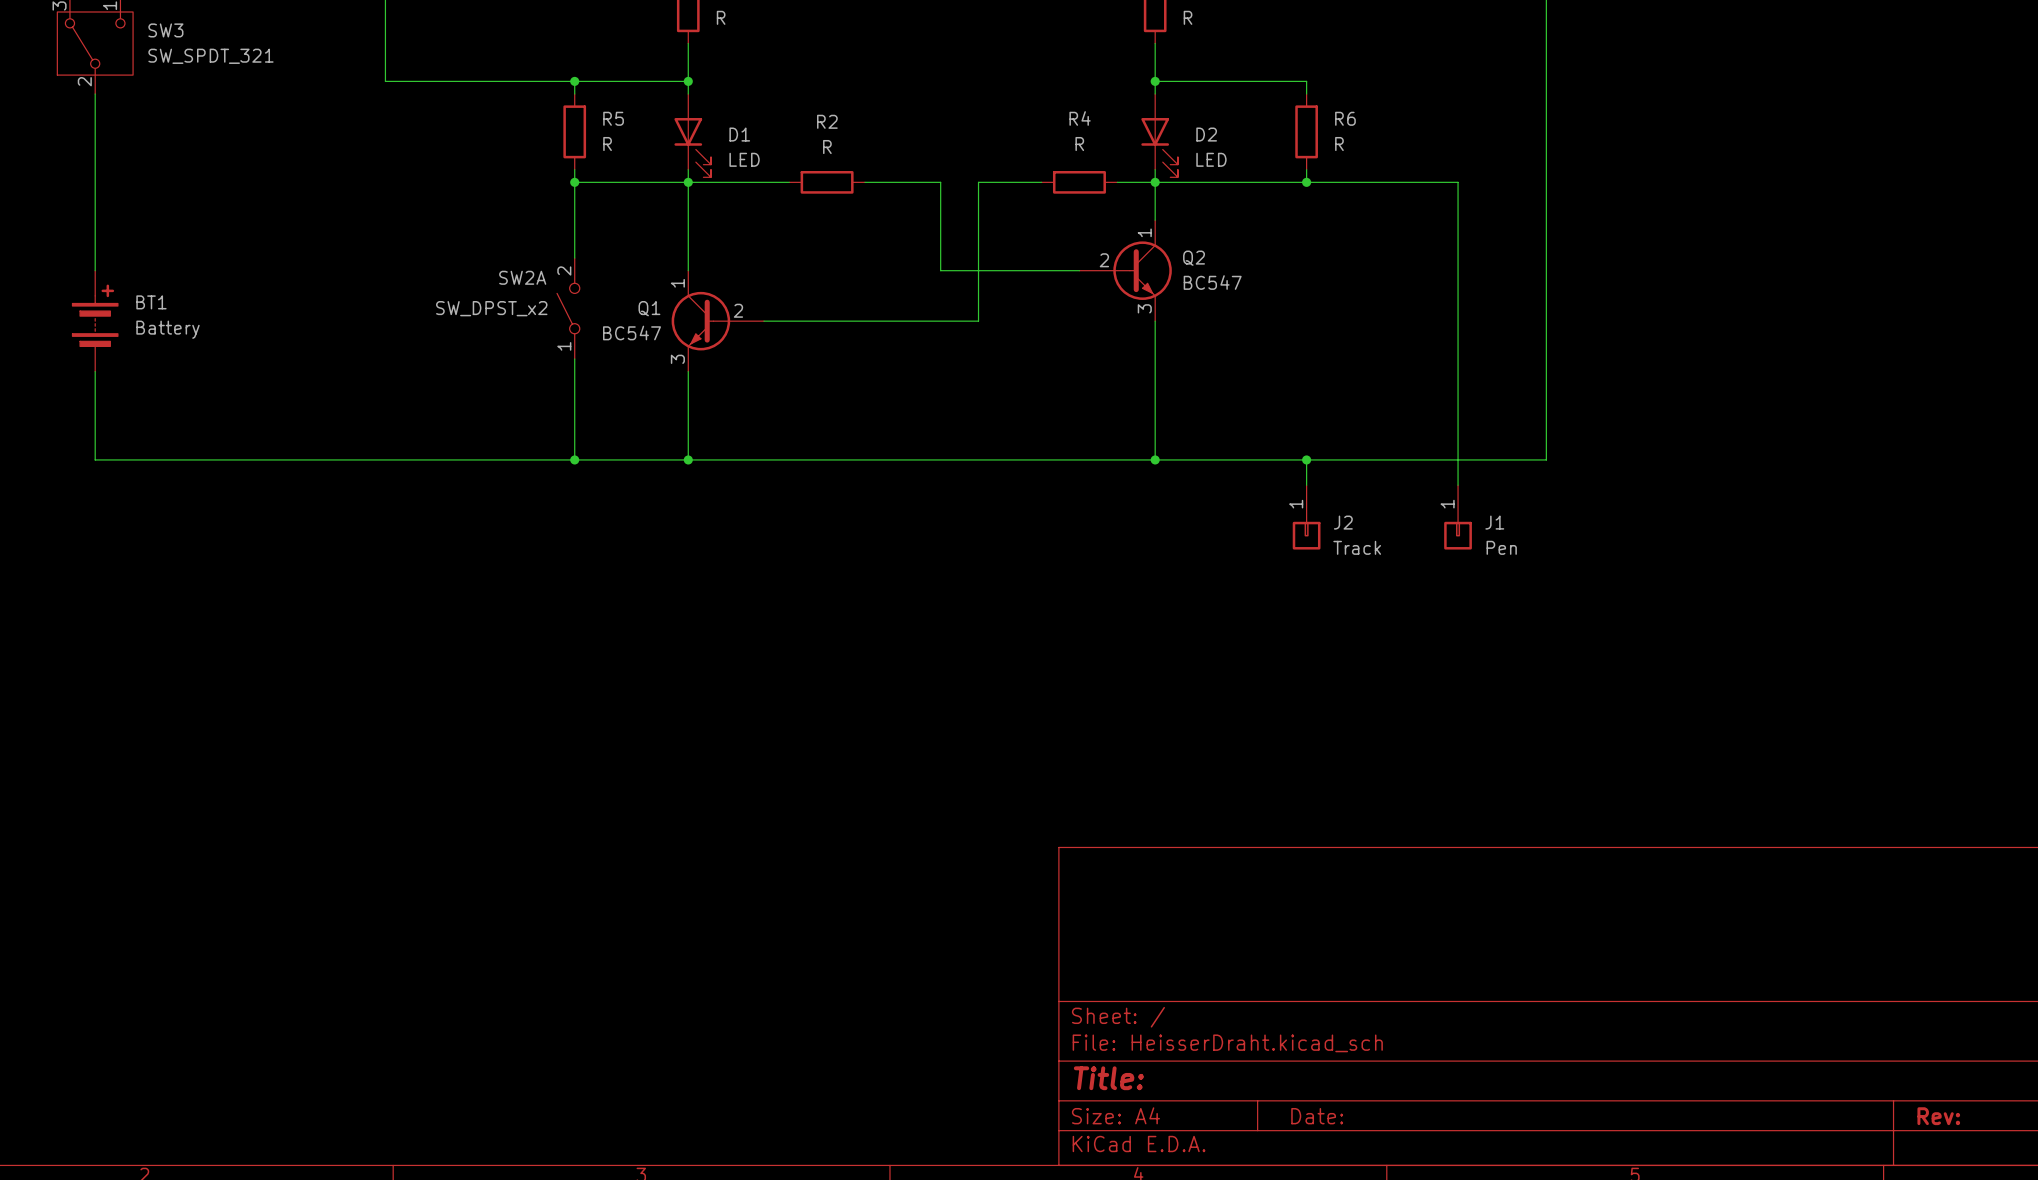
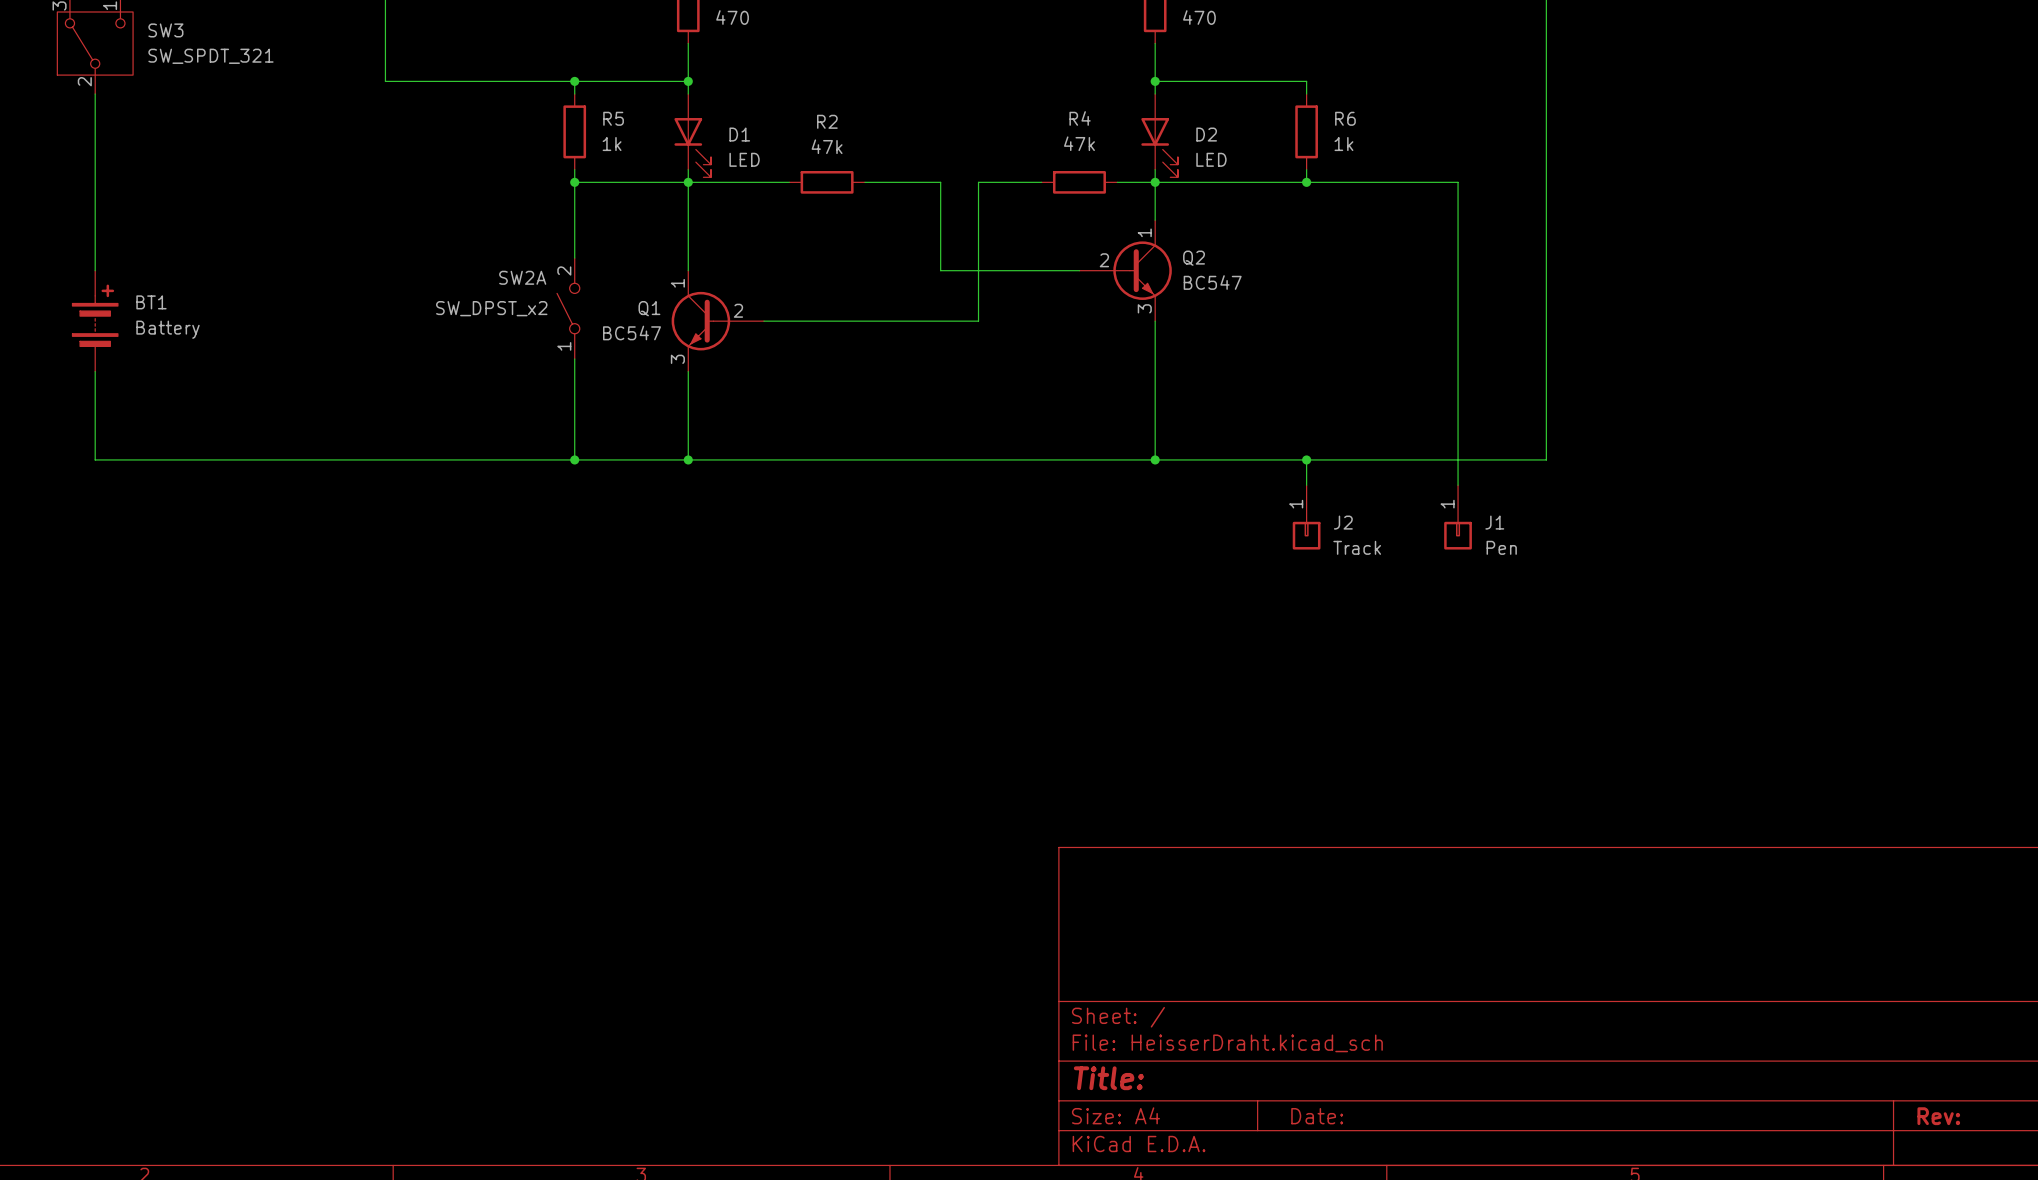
part value: R (721, 17) -> 470 (732, 17)
part value: R (1188, 17) -> 470 (1199, 17)
R5 value: R (607, 144) -> 1k (612, 144)
R4 value: R (1079, 144) -> 47k (1079, 143)
R6 value: R (1339, 144) -> 1k (1343, 144)
R2 value: R (827, 147) -> 47k (827, 146)

